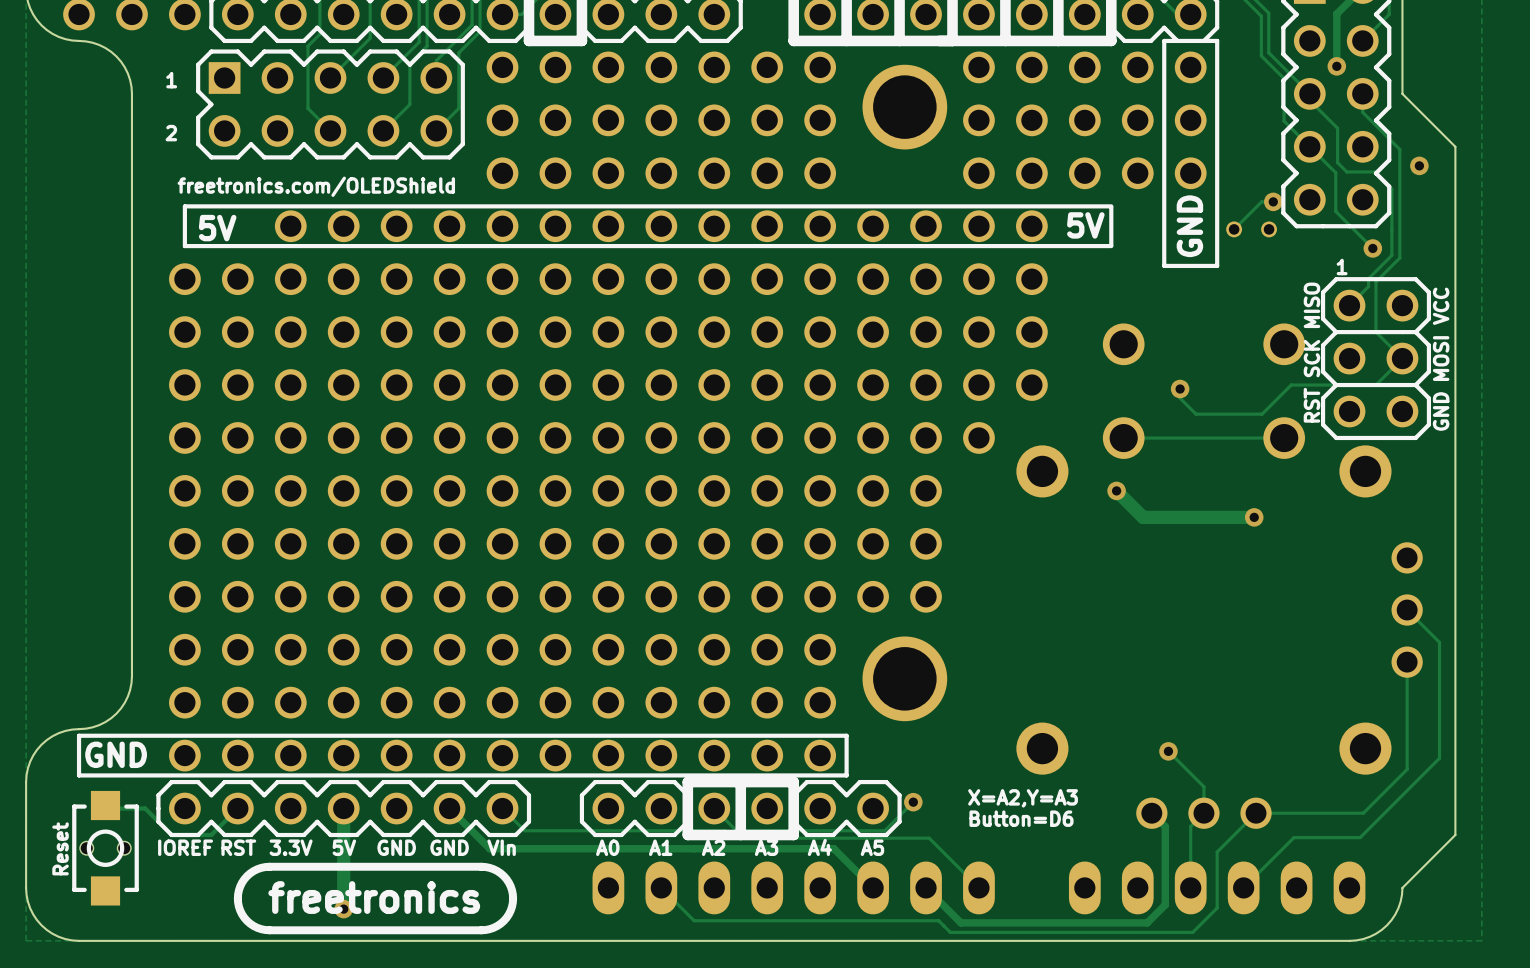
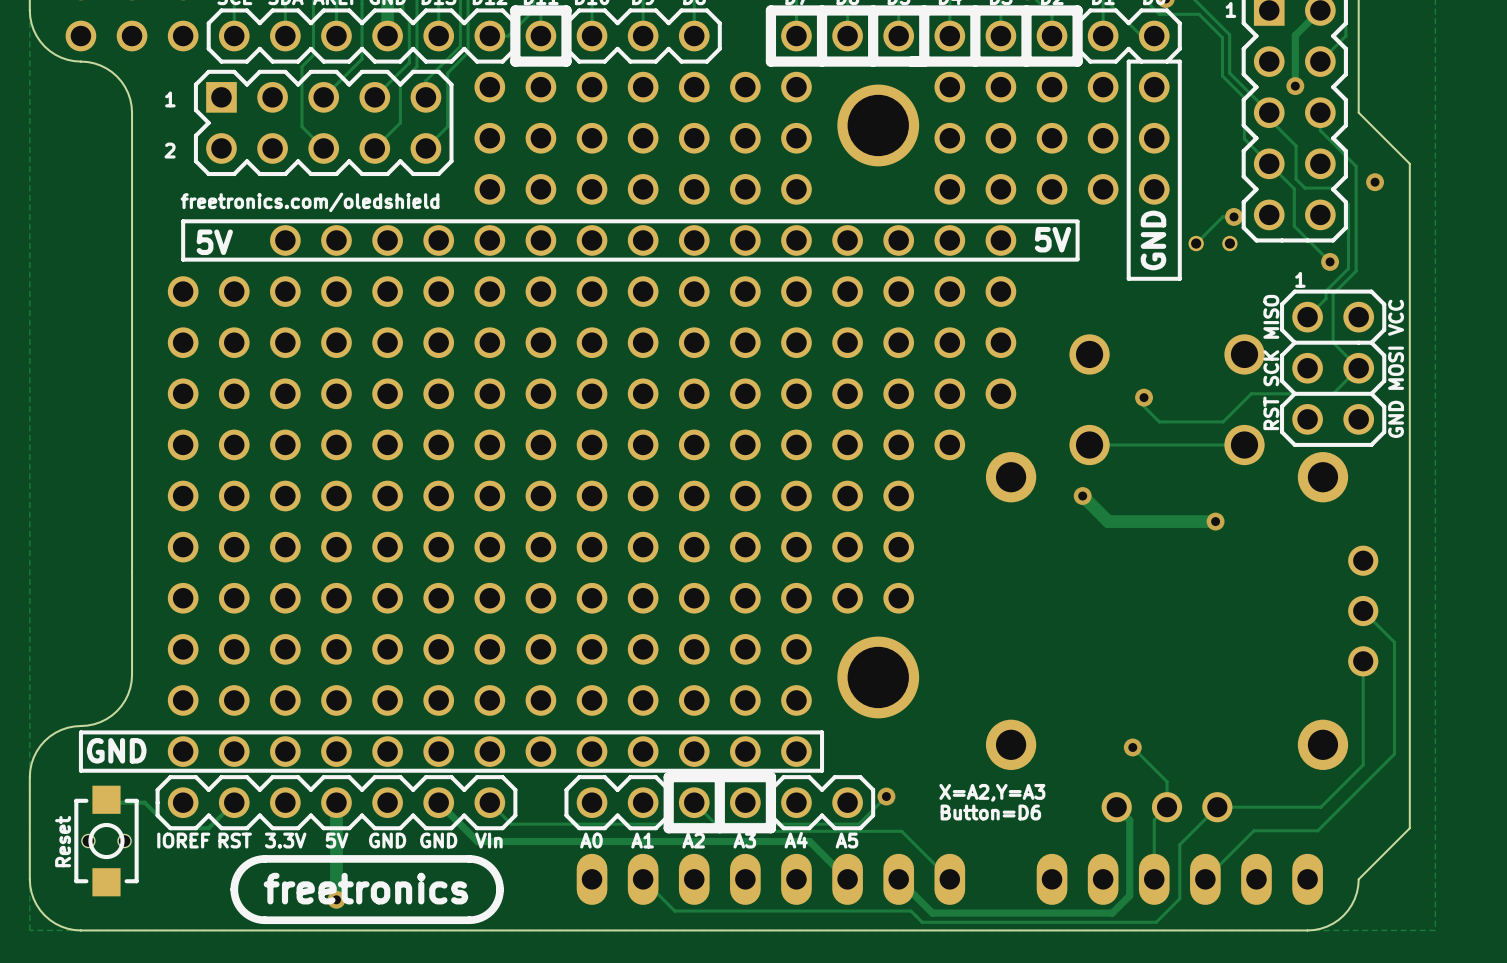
text: freetronics.com/OLEDShield (316, 186) -> freetronics.com/oledshield (310, 202)

